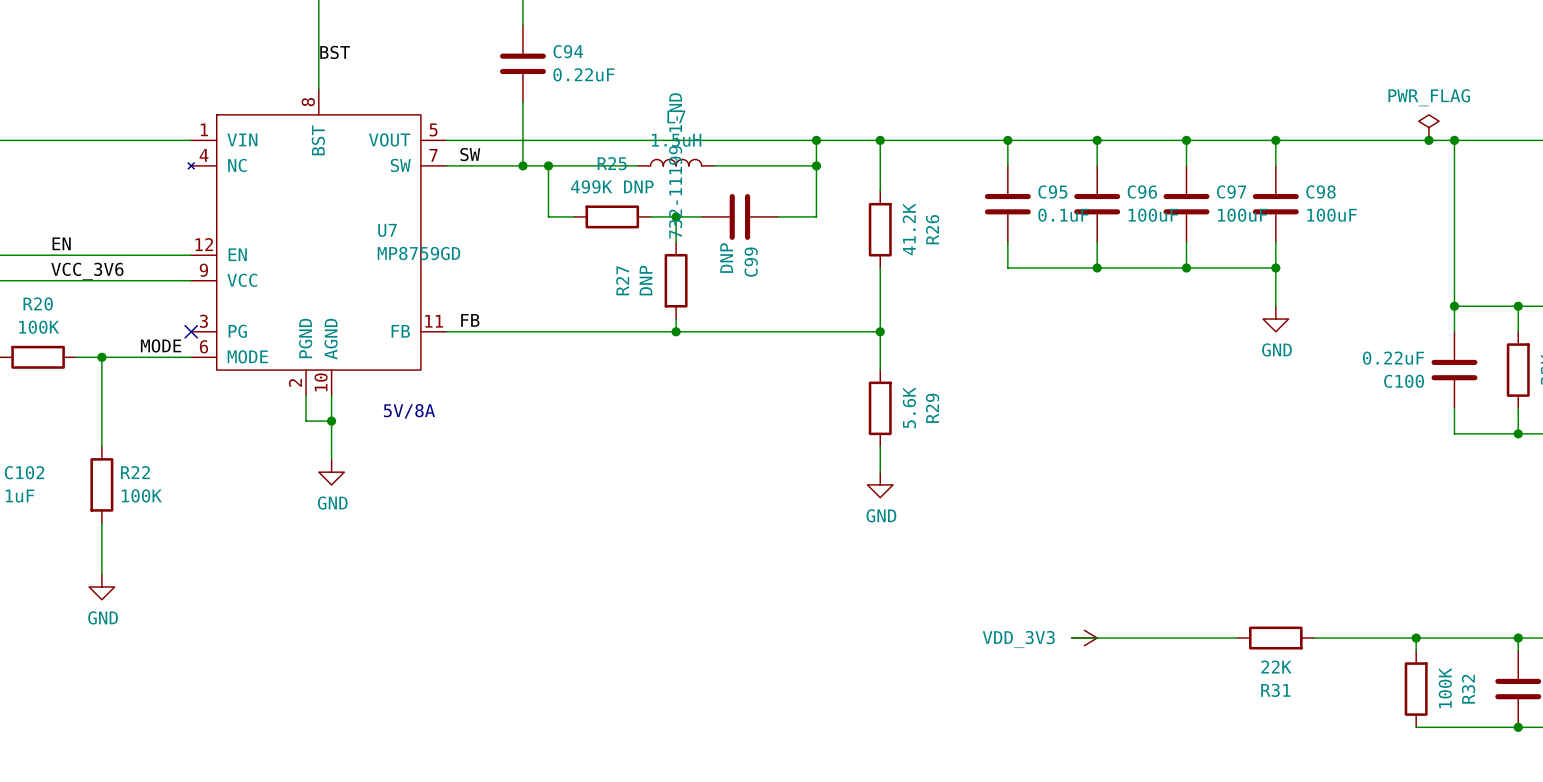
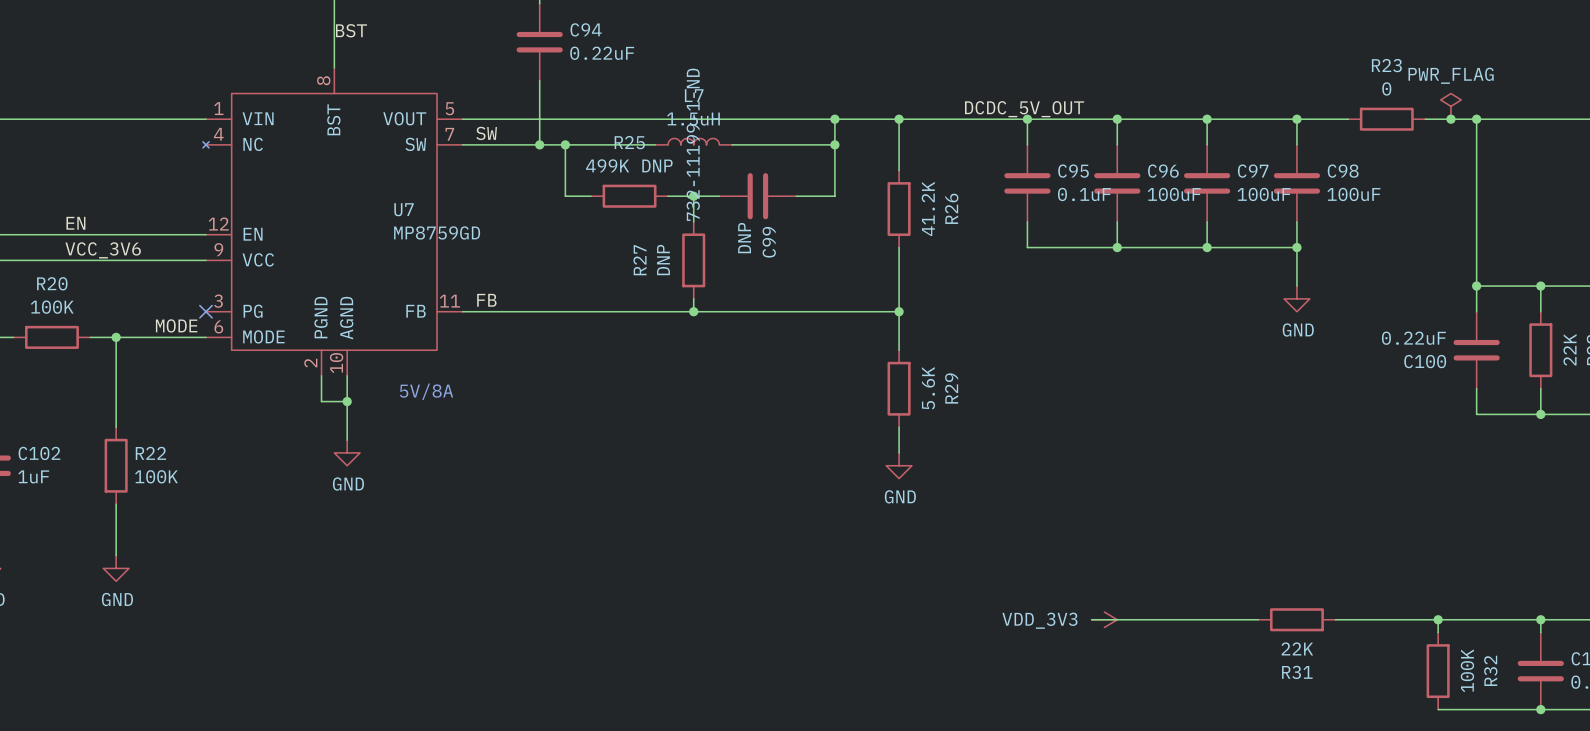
label: none -> DCDC_5V_OUT (1024, 109)
wire: (1326, 140) (1403, 140) -> none
R23: none -> 0 (1386, 119)

